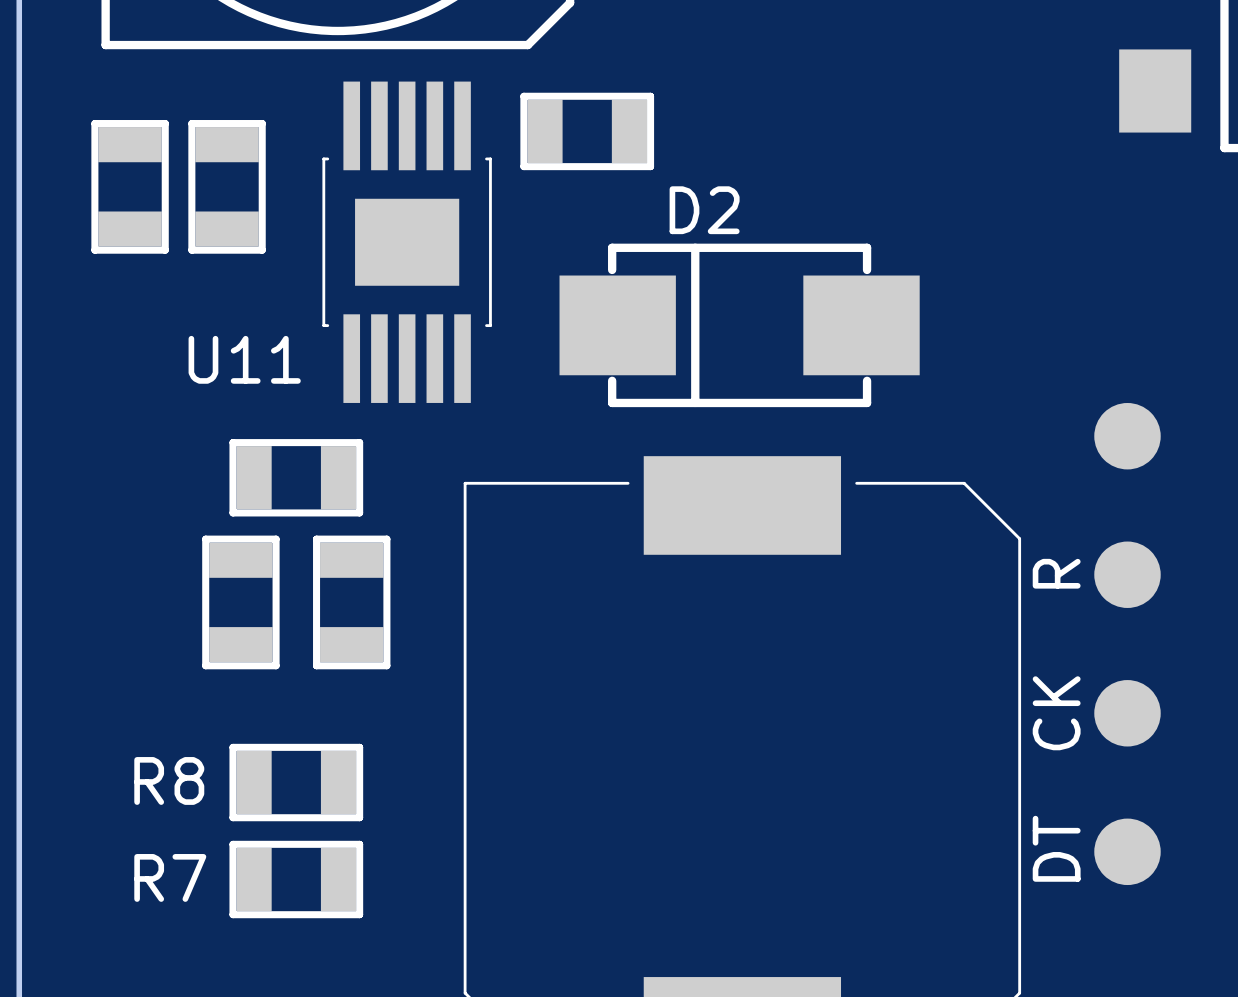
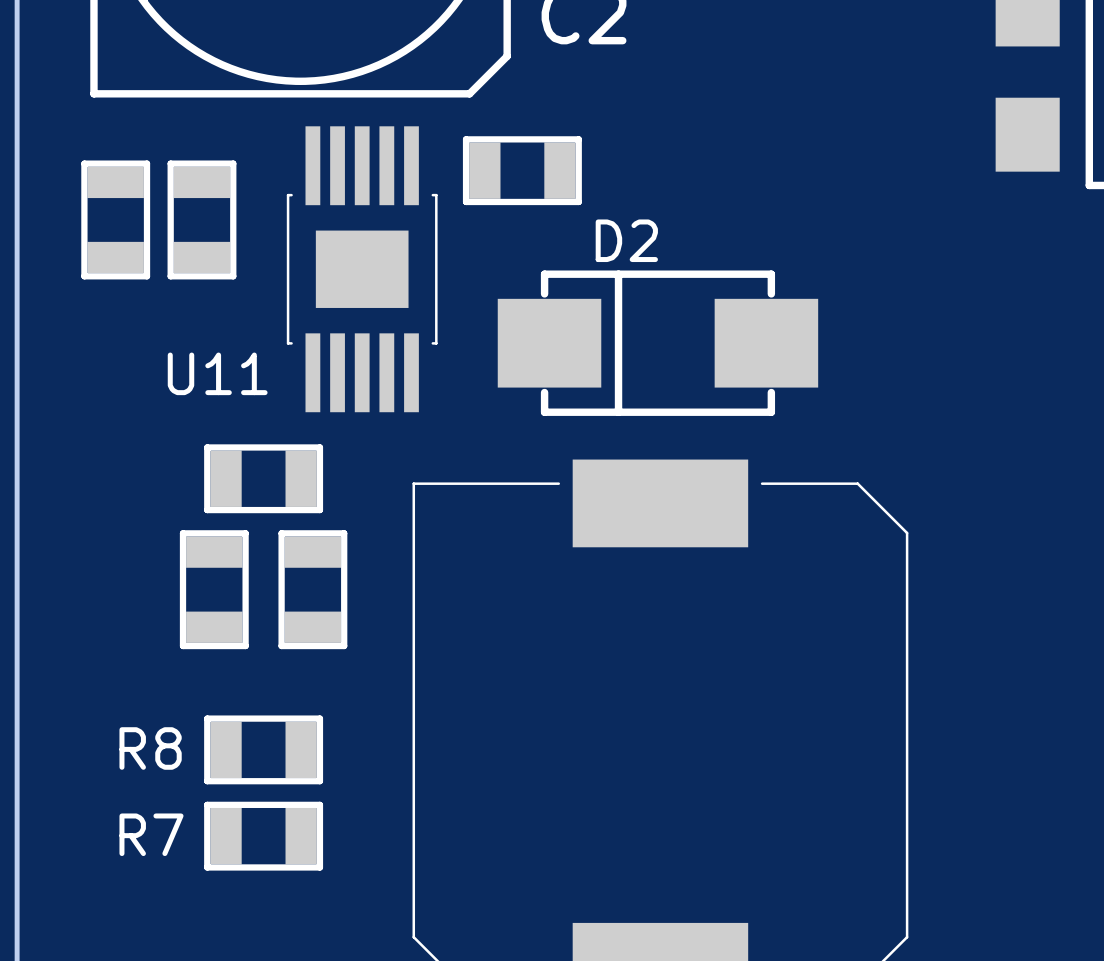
part: (1127, 436) -> none
text: R (1056, 573) -> none
part: (1127, 574) -> none
text: CK (1056, 713) -> none
part: (1127, 713) -> none
text: DT (1056, 848) -> none
part: (1127, 851) -> none

